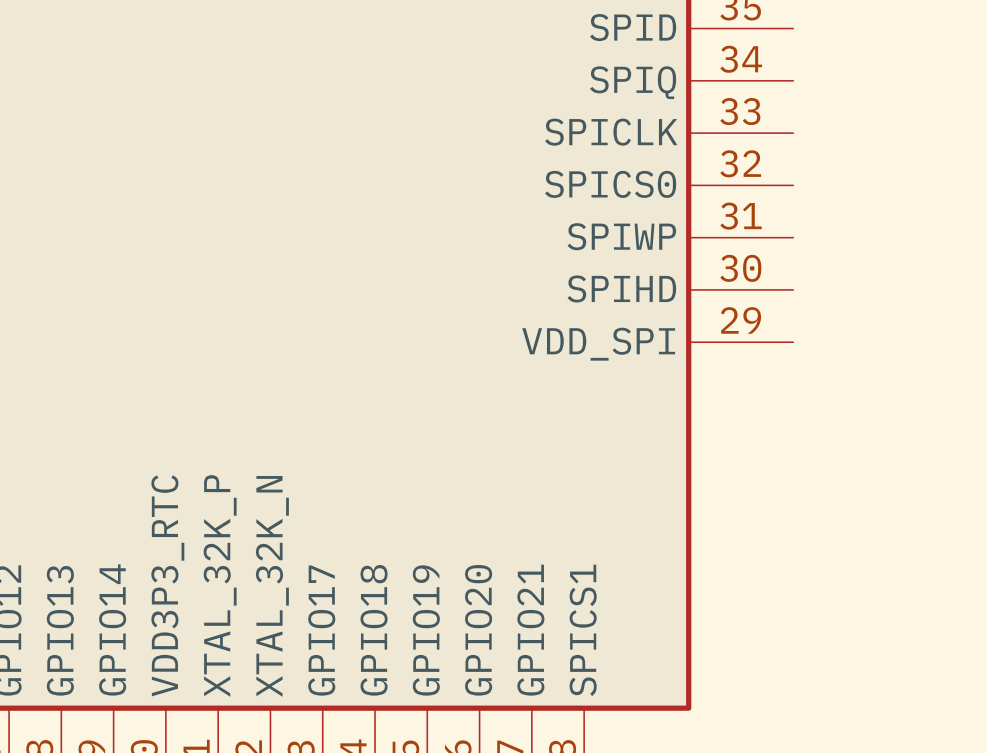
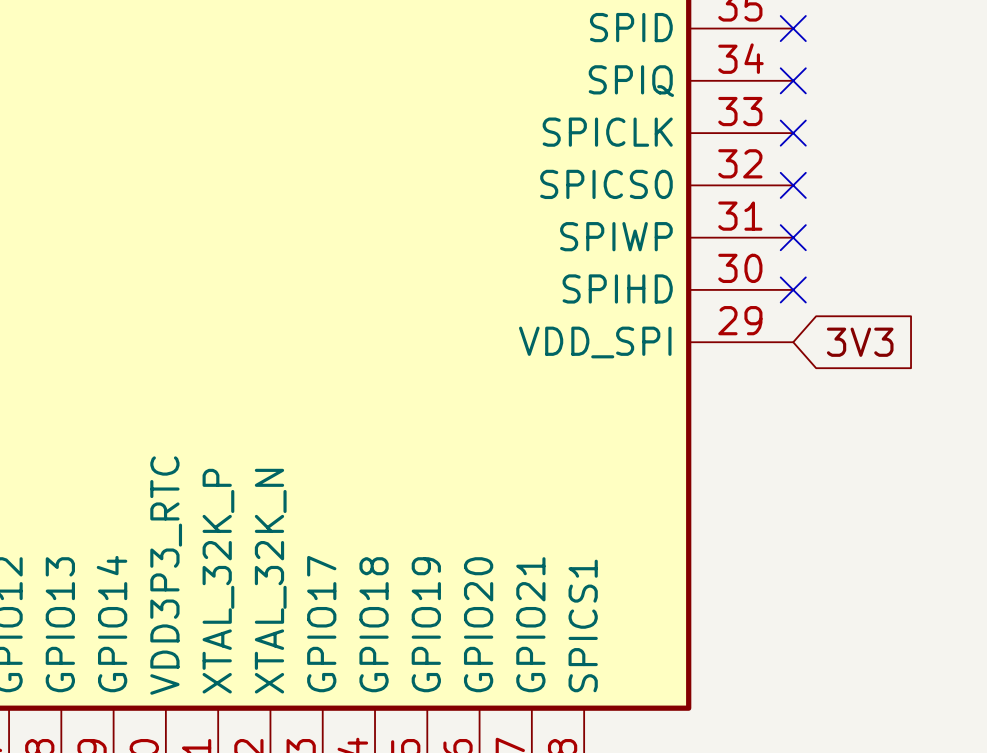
no-connect mark: none -> (793, 28)
no-connect mark: none -> (793, 80)
no-connect mark: none -> (793, 133)
no-connect mark: none -> (793, 185)
no-connect mark: none -> (793, 237)
no-connect mark: none -> (793, 289)
global label: none -> 3V3 (860, 342)

